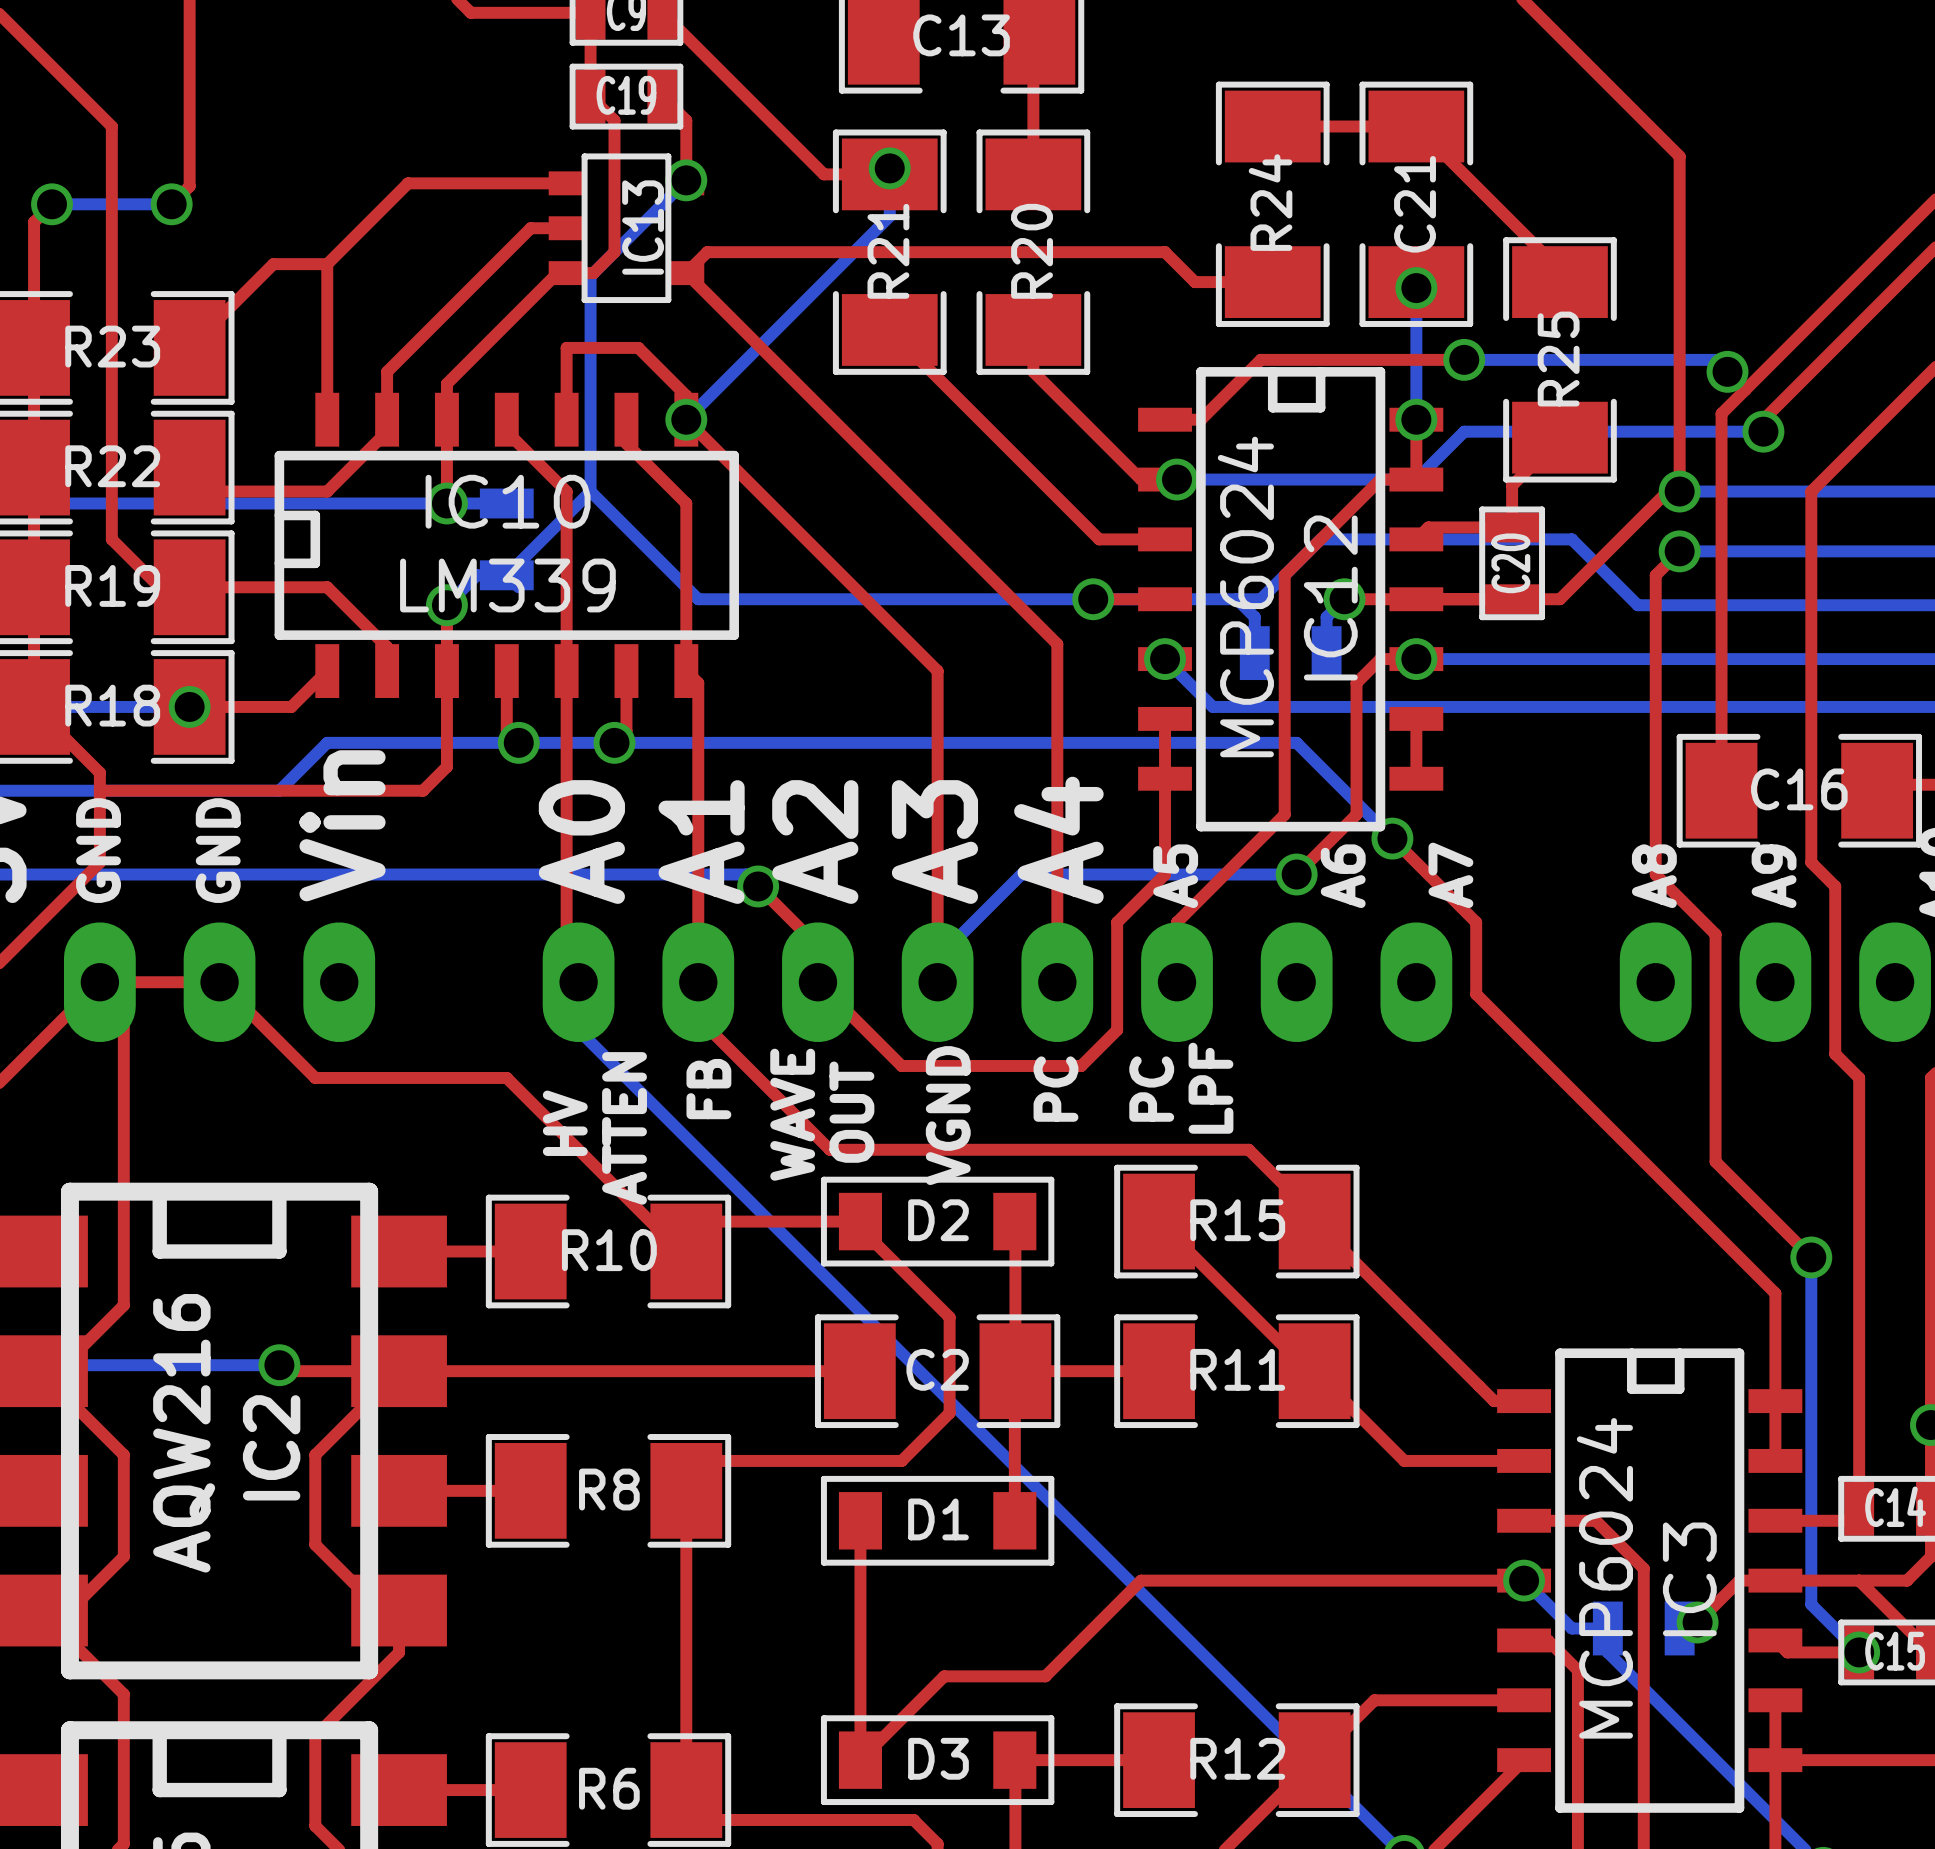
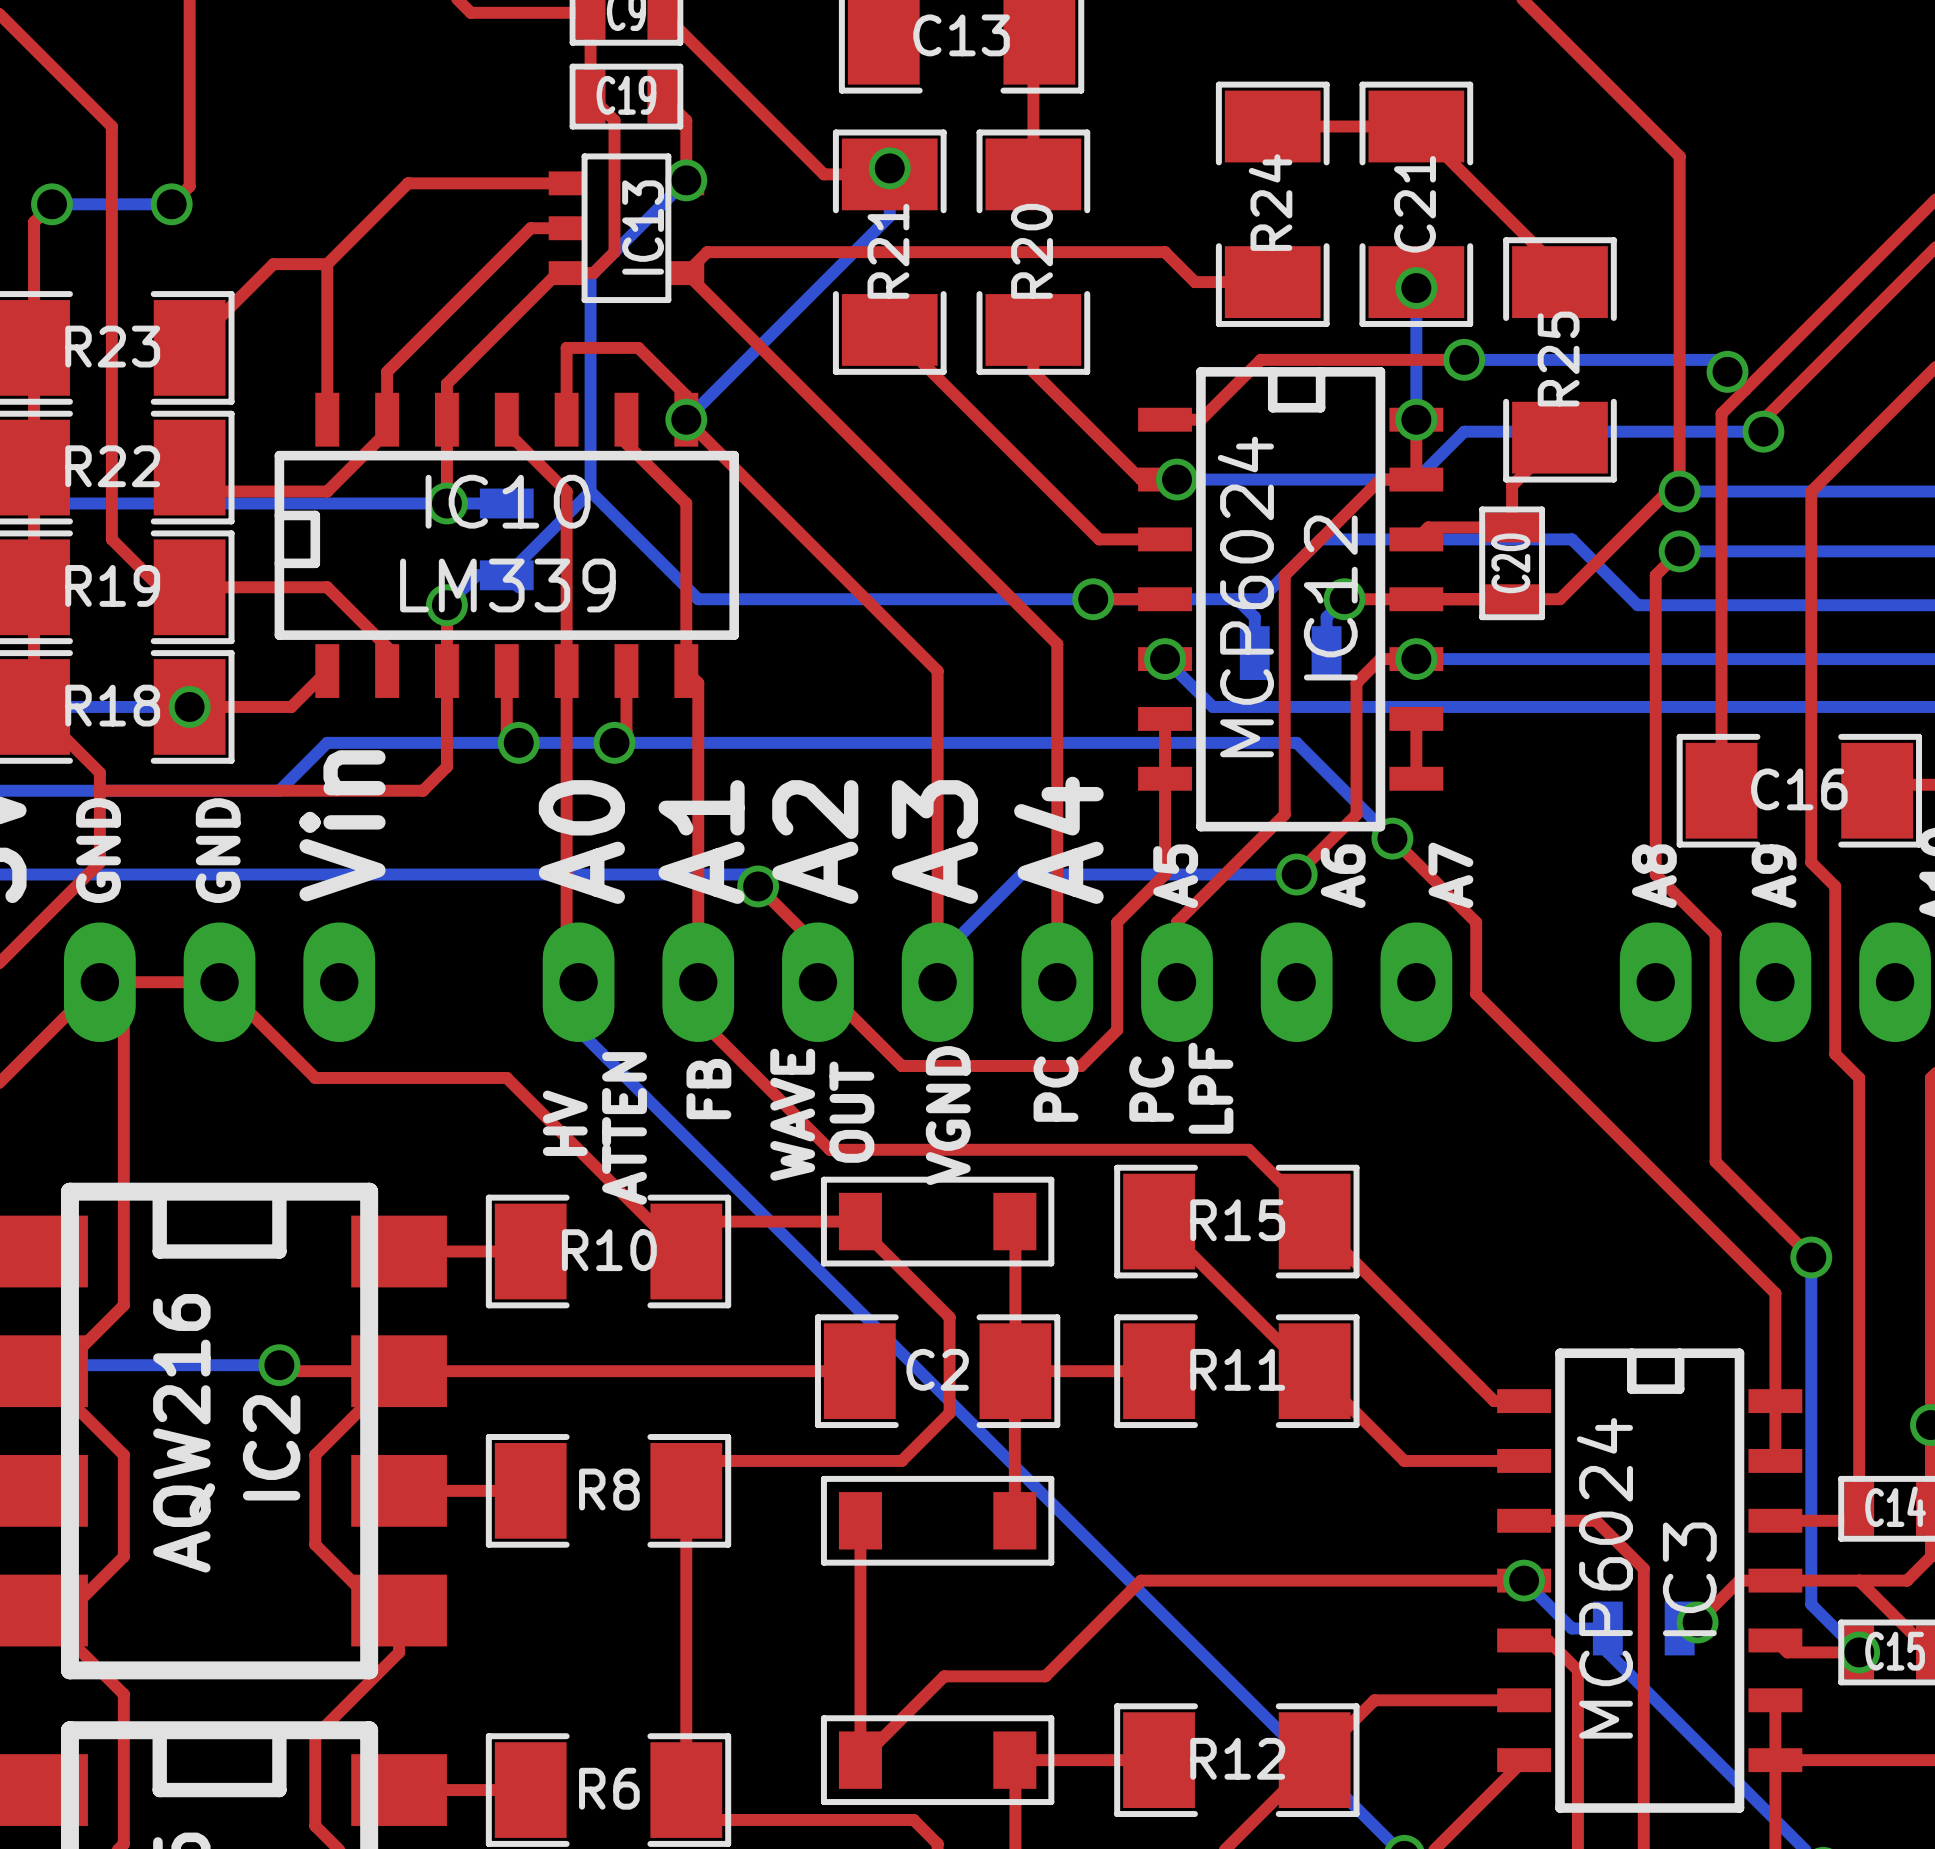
D2 name: D2 (938, 1220) -> none
D1 name: D1 (938, 1519) -> none
D3 name: D3 (938, 1758) -> none

